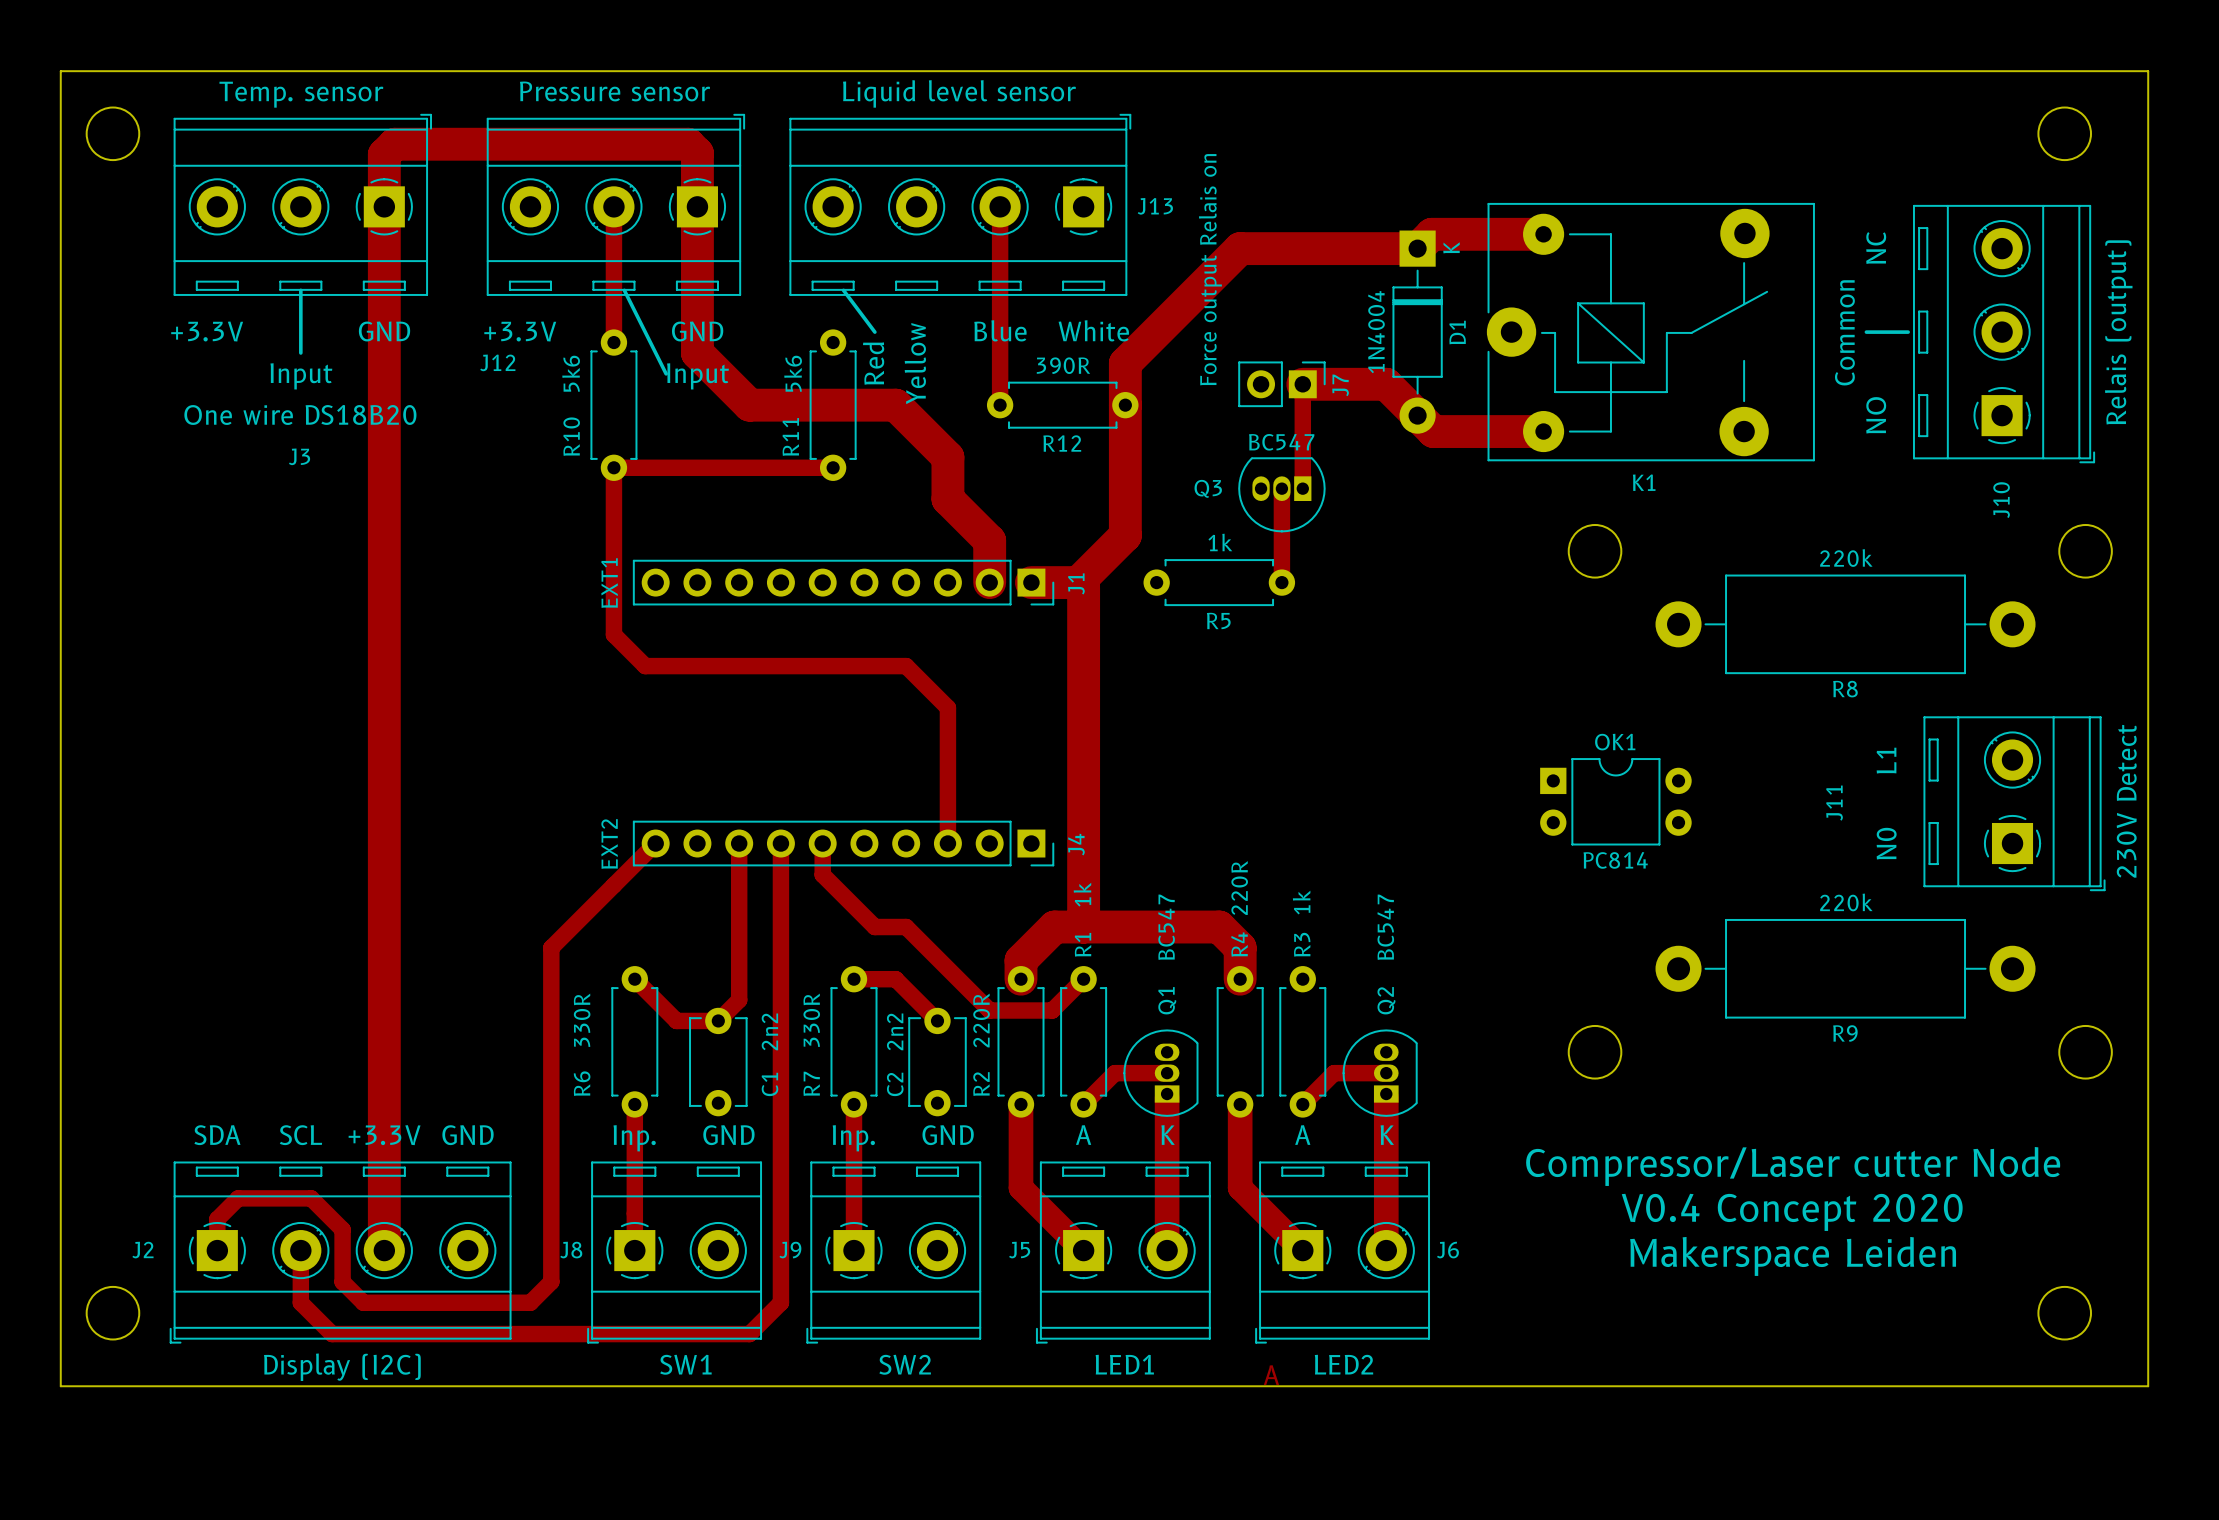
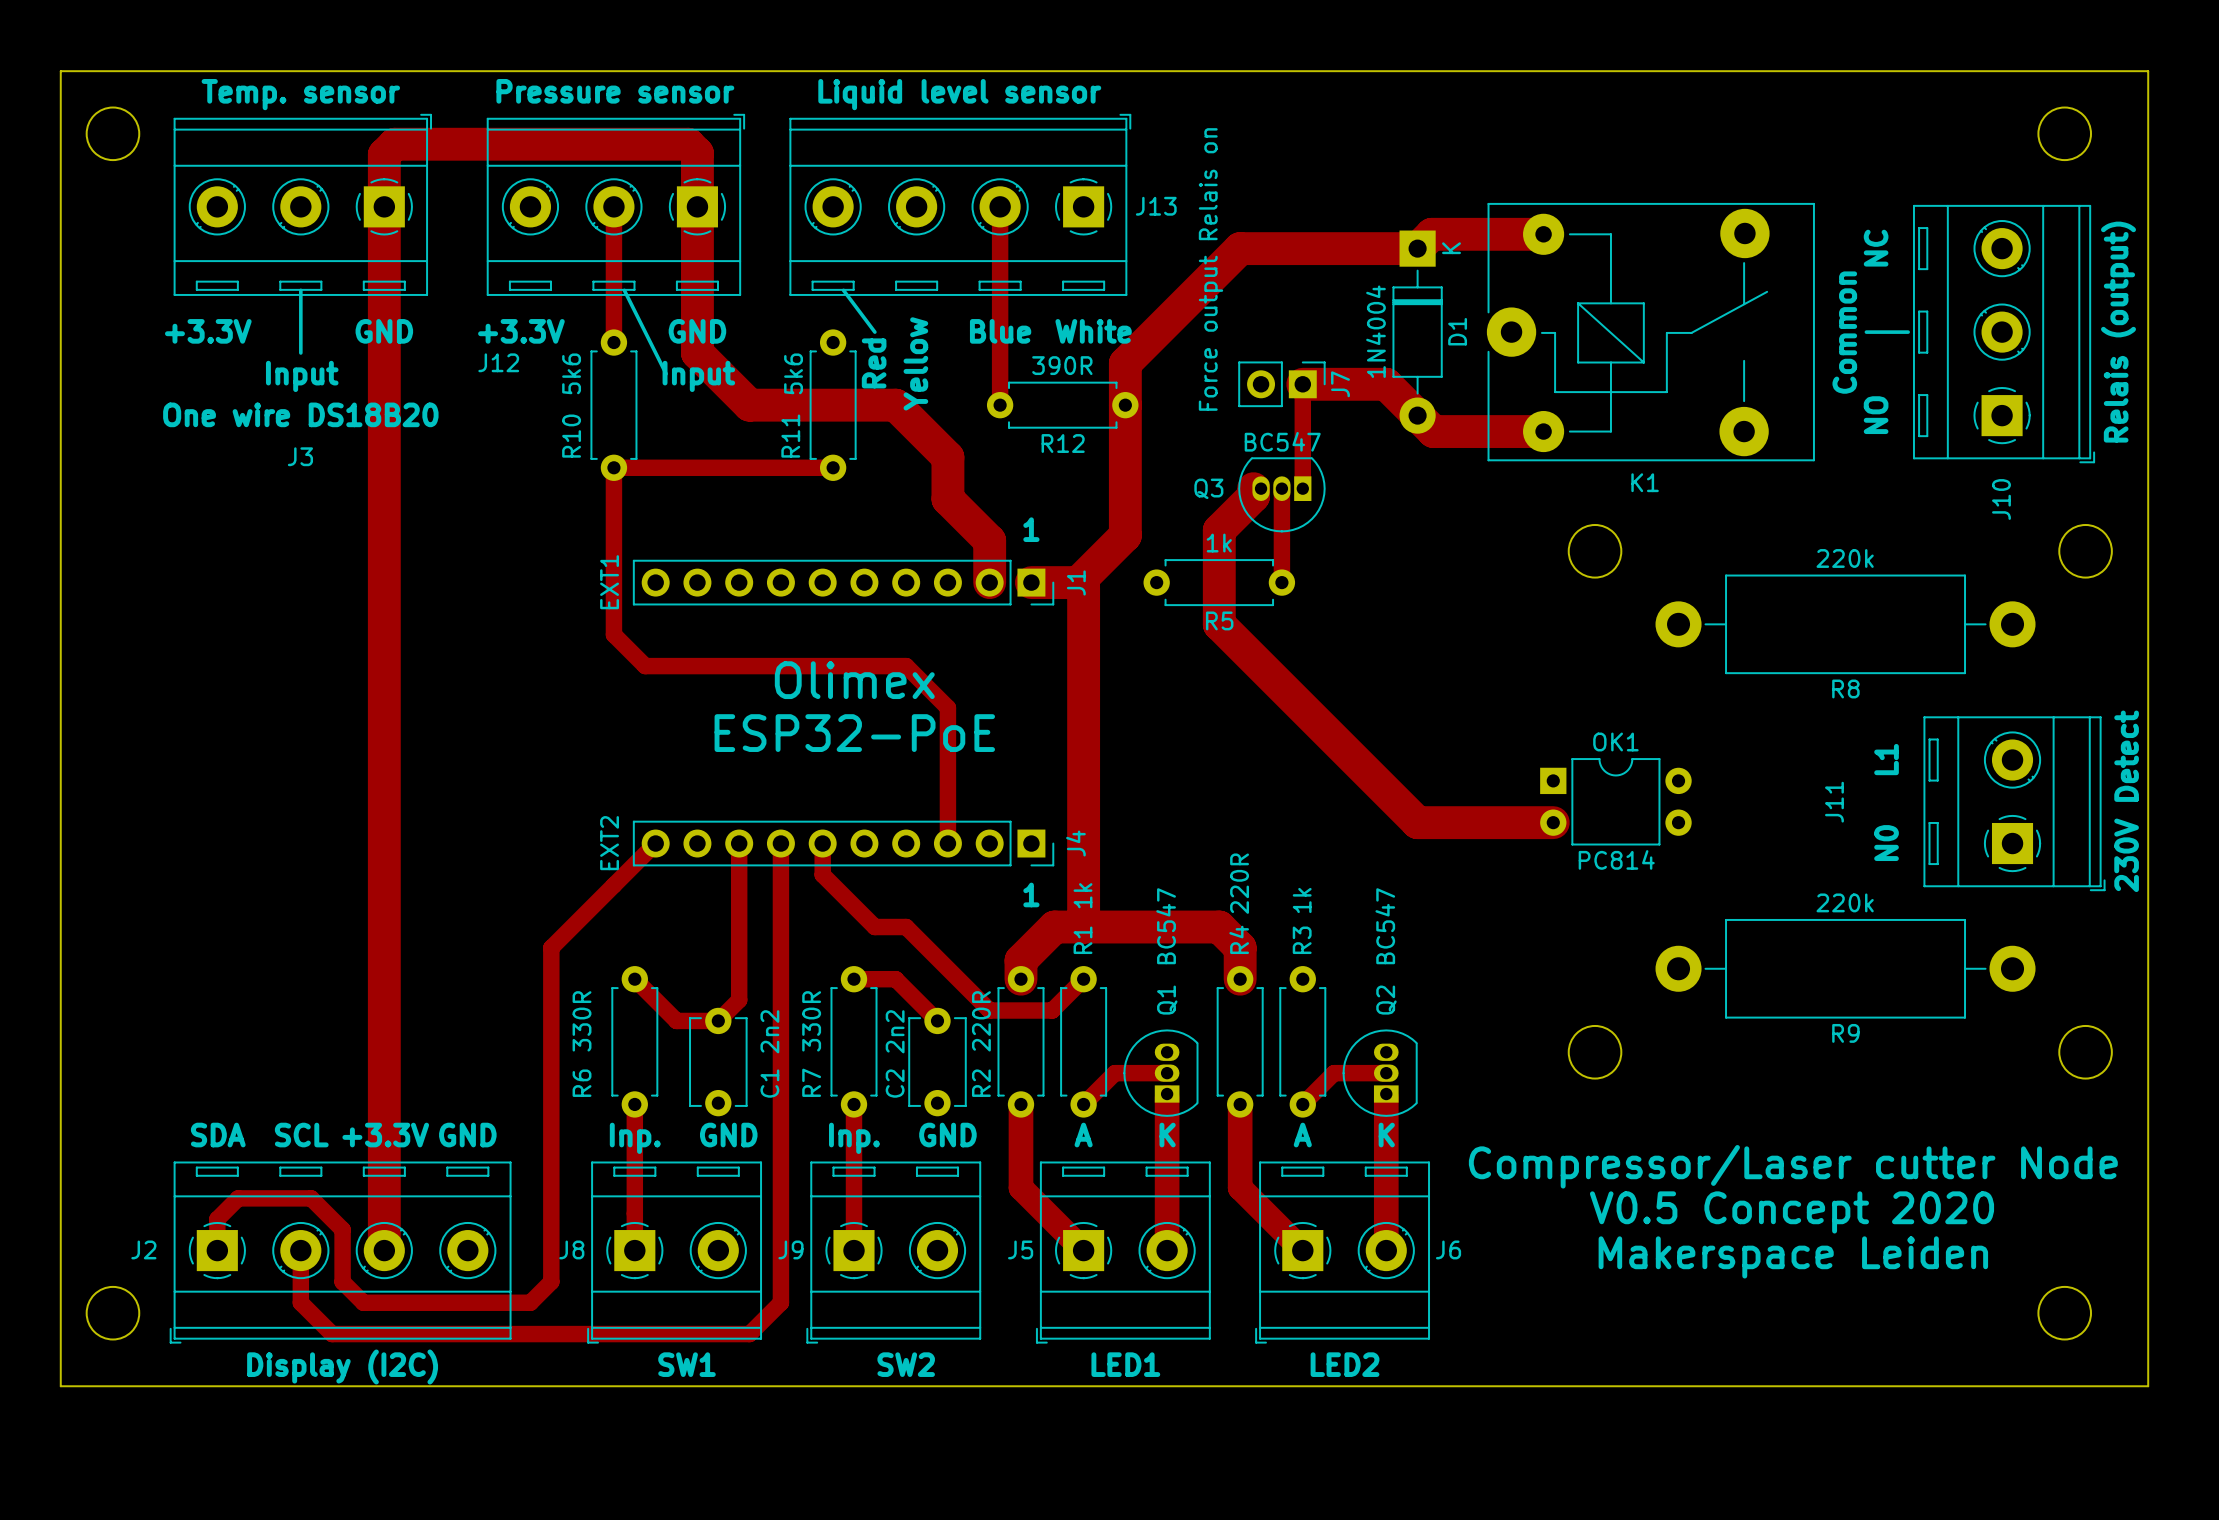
track: none -> (1253, 488) (1253, 496) (1219, 530) (1219, 624) (1417, 822) (1553, 822)
text: none -> 1 (1031, 529)
text: none -> Olimex (854, 680)
text: none -> ESP32-PoE (854, 733)
text: none -> 1 (1031, 894)
text: V0.4 Concept 2020 (1792, 1212) -> V0.5 Concept 2020 (1792, 1212)
text: A (1271, 1375) -> none

